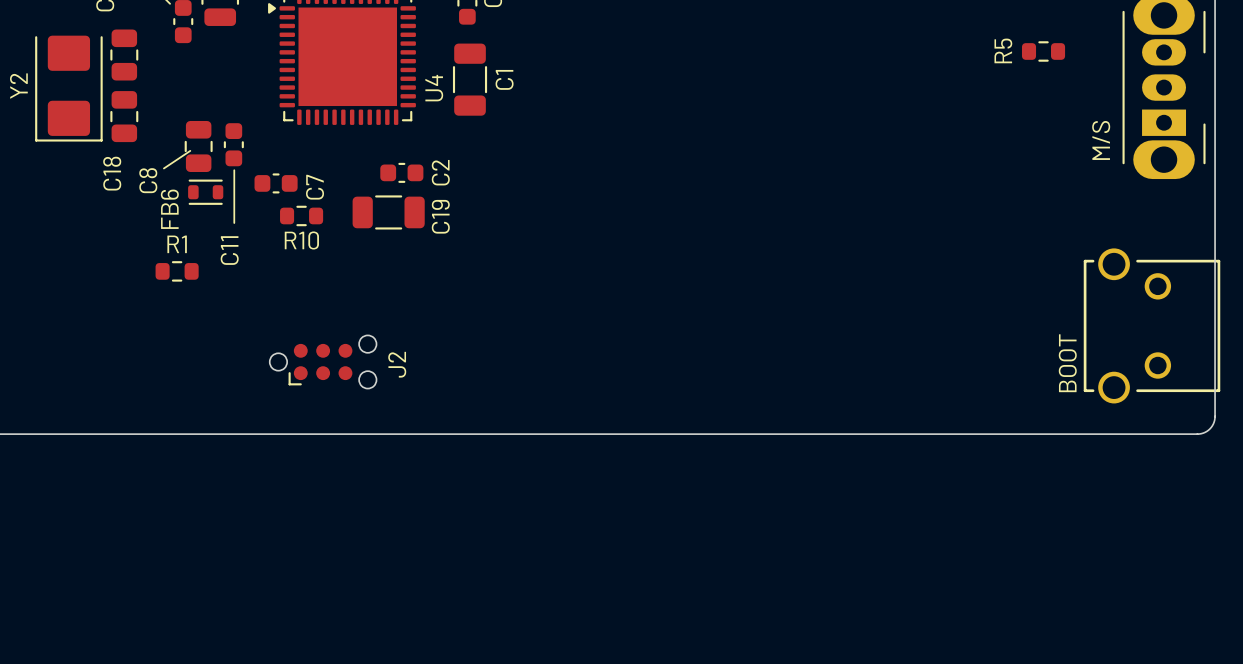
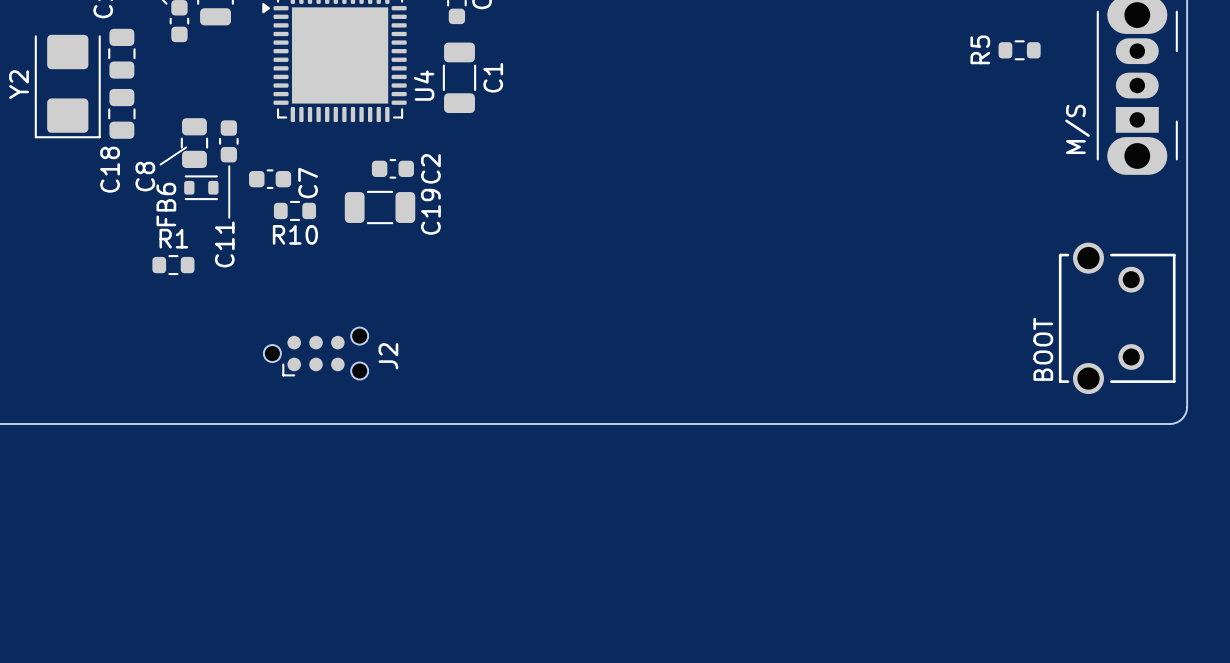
part footprint: [1083, 248, 1221, 404] -> [1058, 242, 1176, 395]

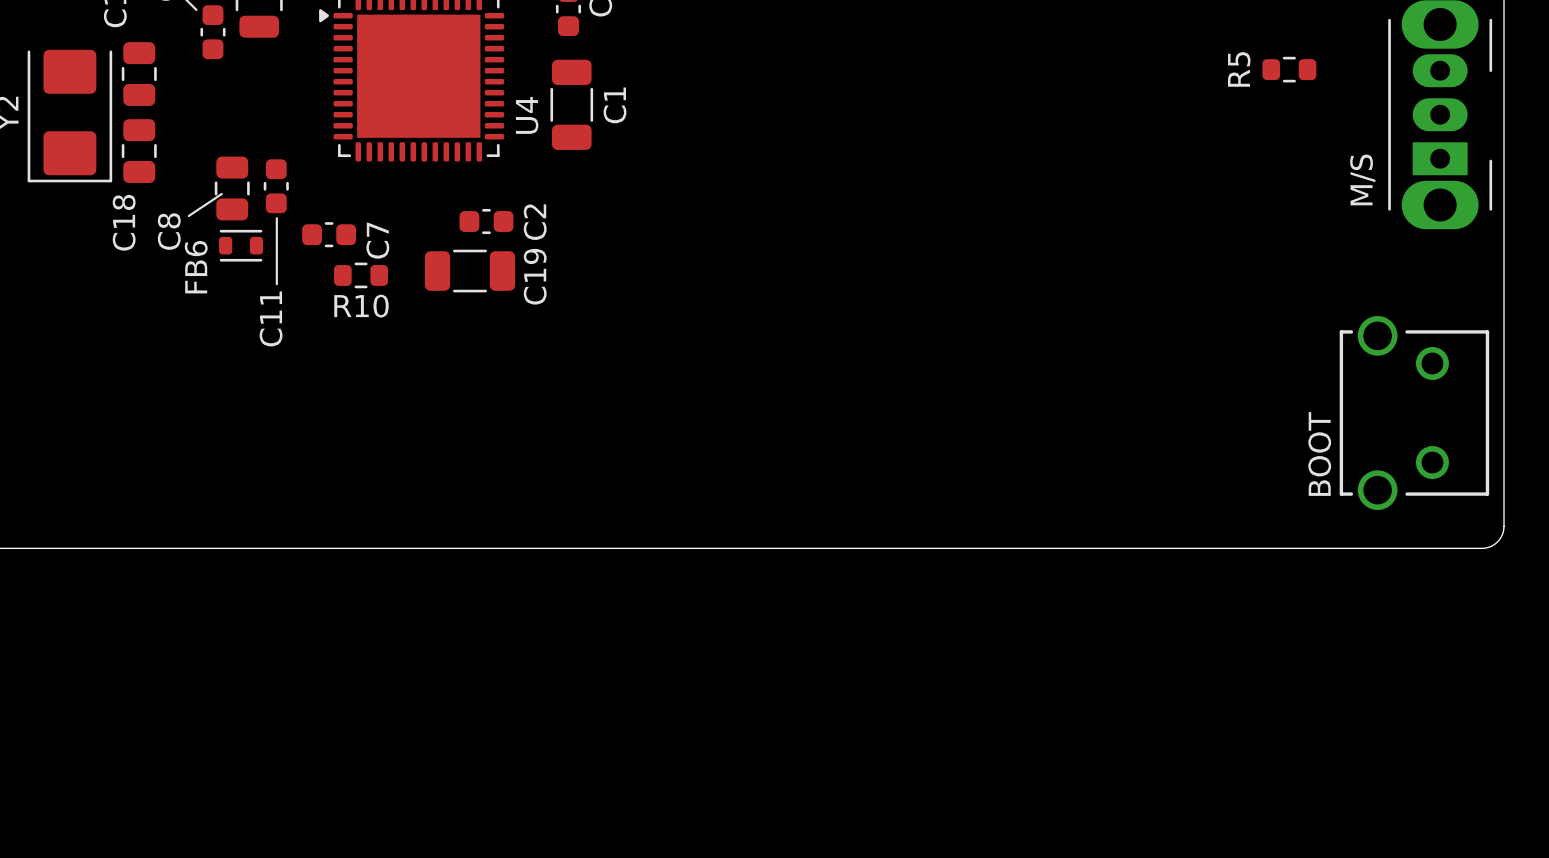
R1: (173, 265) -> none
J2: (316, 353) -> none

